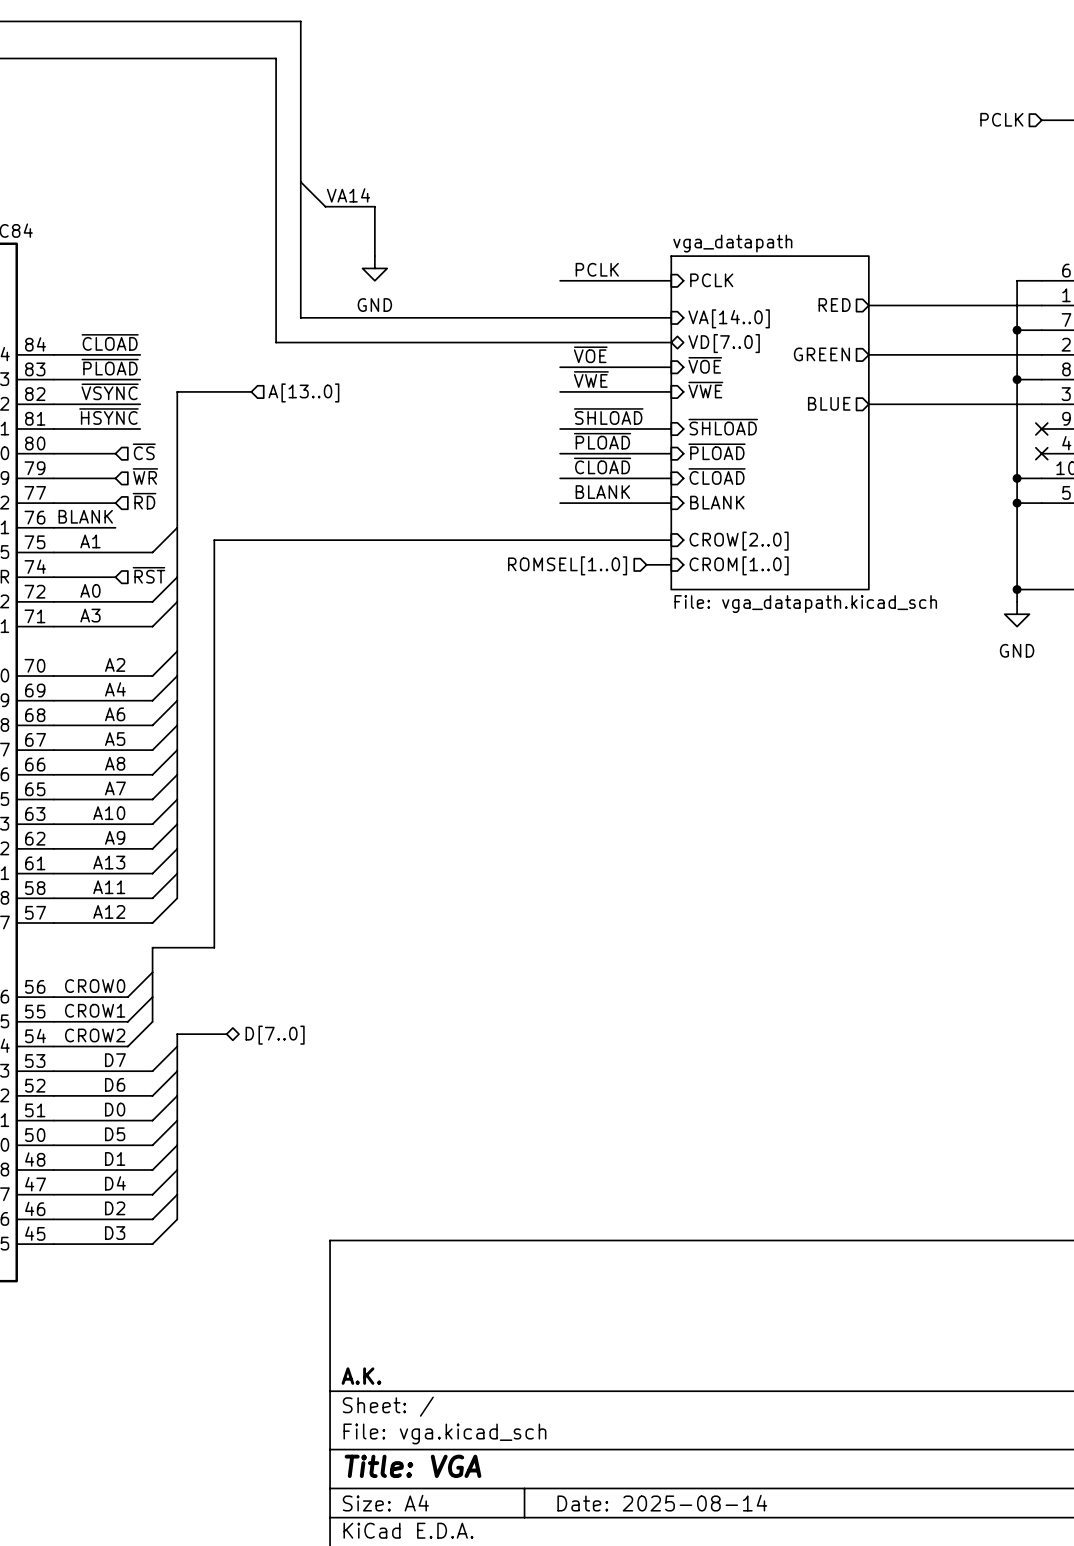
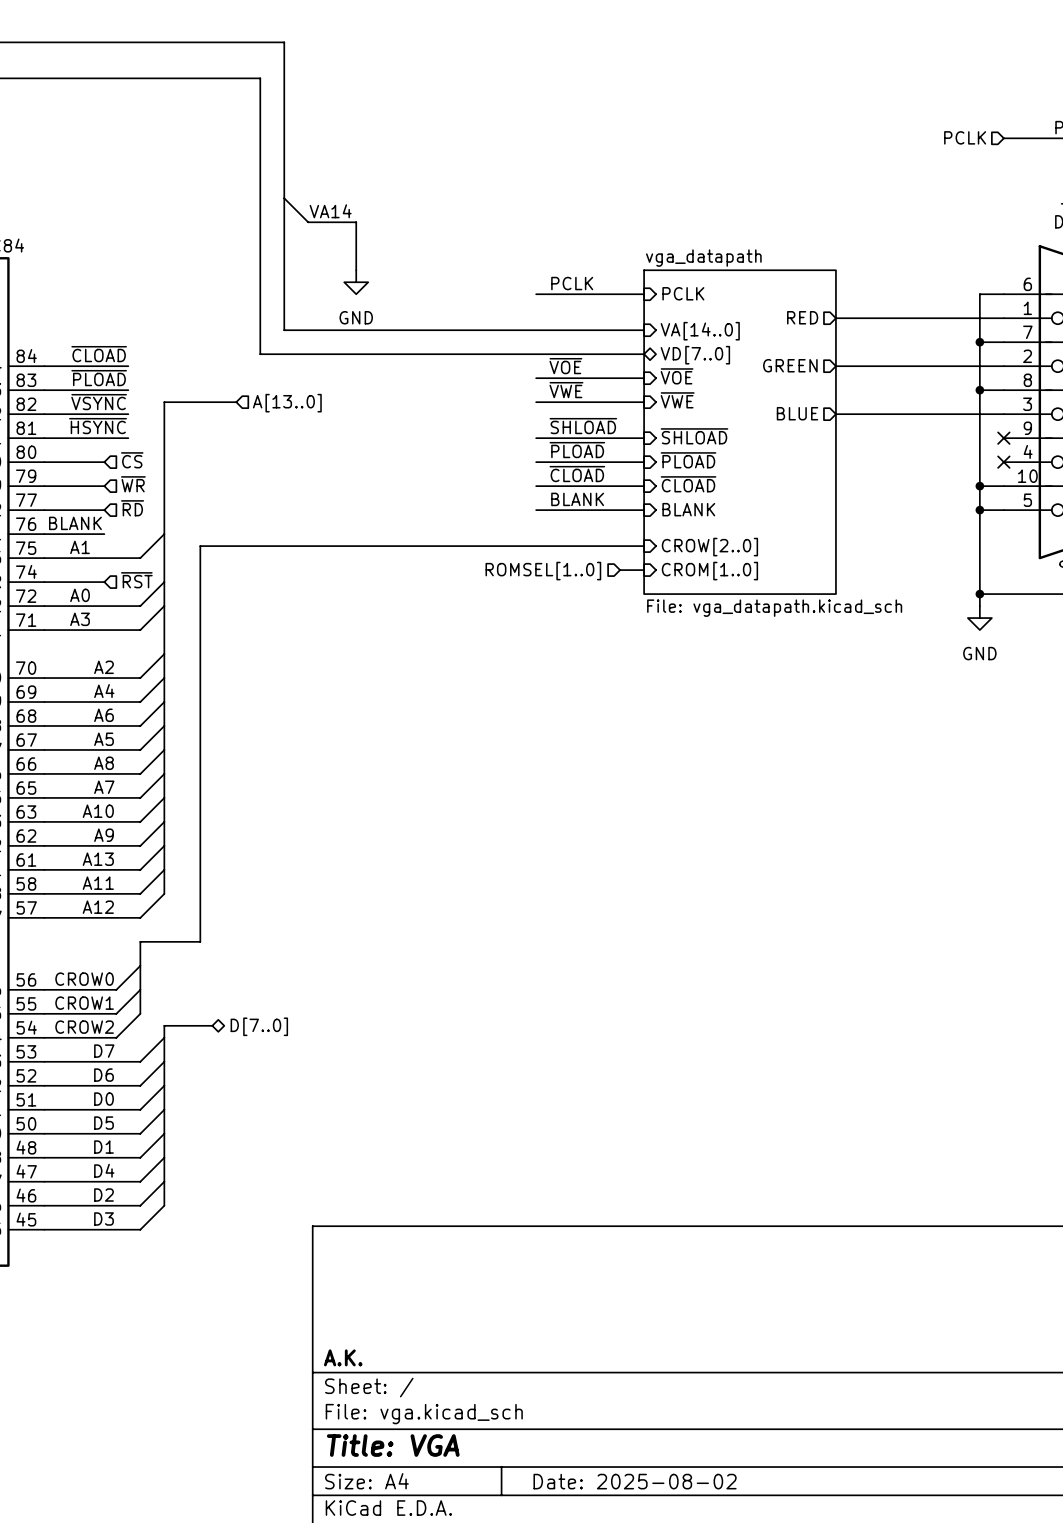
title block: Date: 2025-08-14 (662, 1503) -> Date: 2025-08-02 (635, 1481)

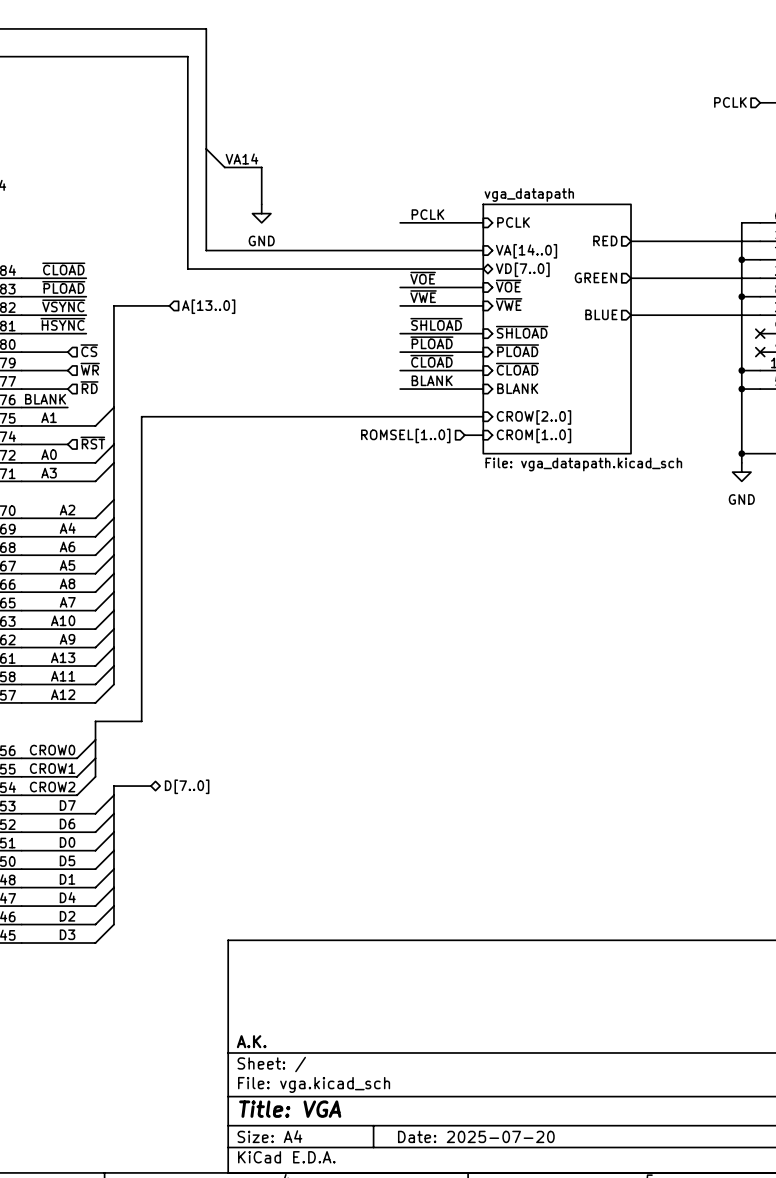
title block: Date: 2025-08-02 (635, 1481) -> Date: 2025-07-20 (476, 1136)

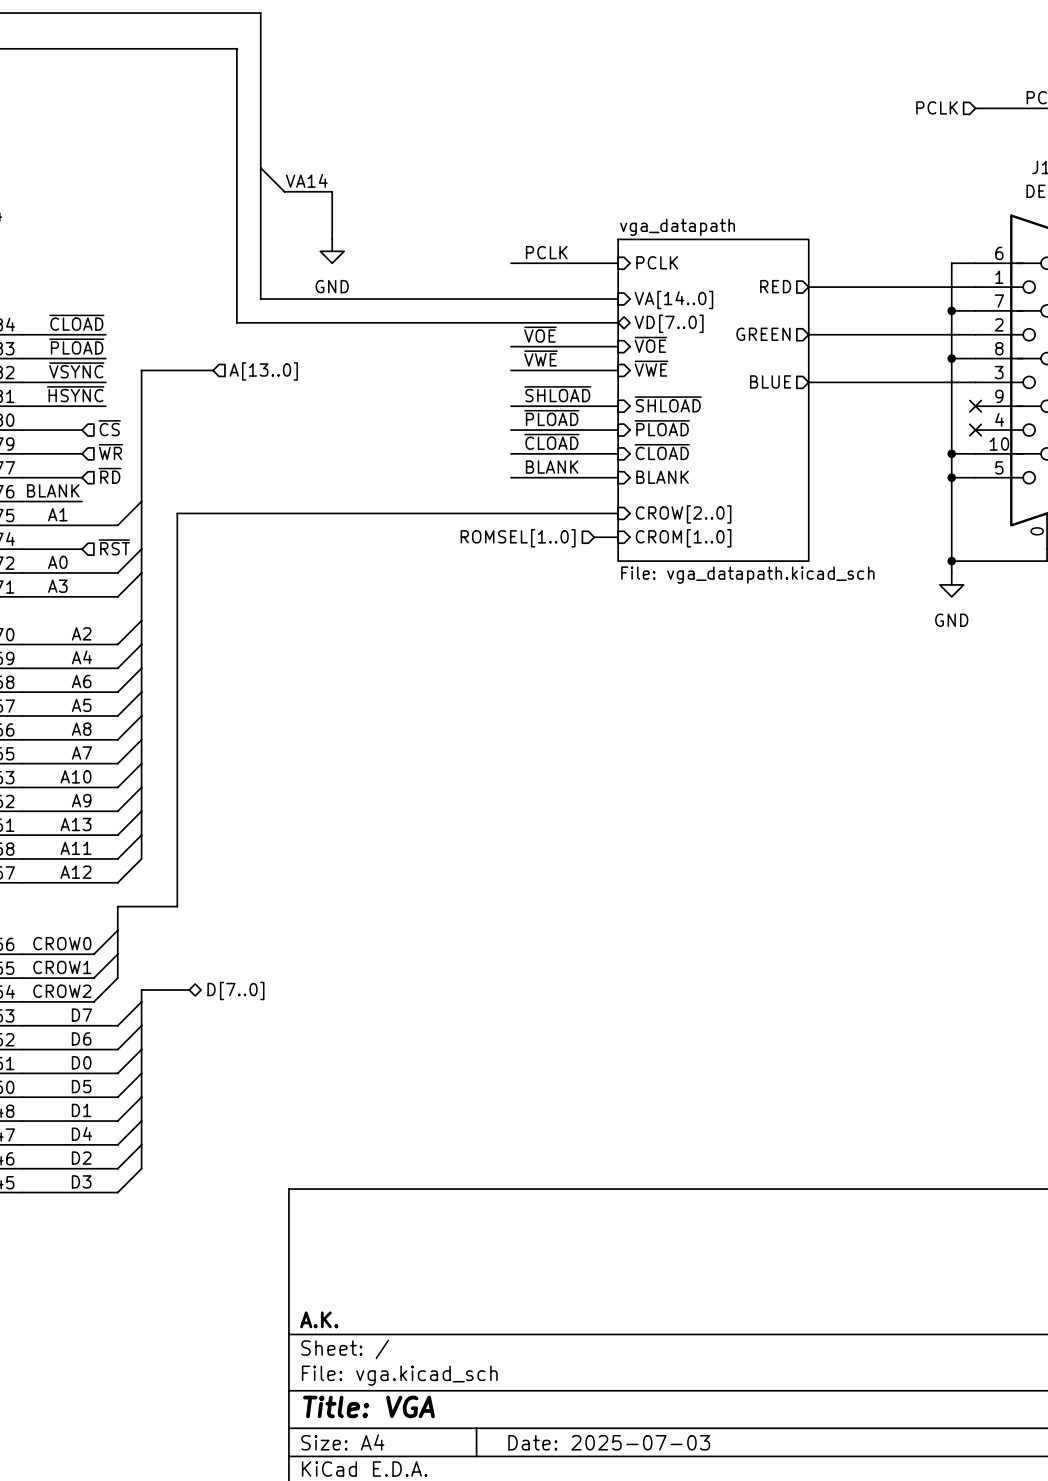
title block: Date: 2025-07-20 (476, 1136) -> Date: 2025-07-03 (609, 1442)

